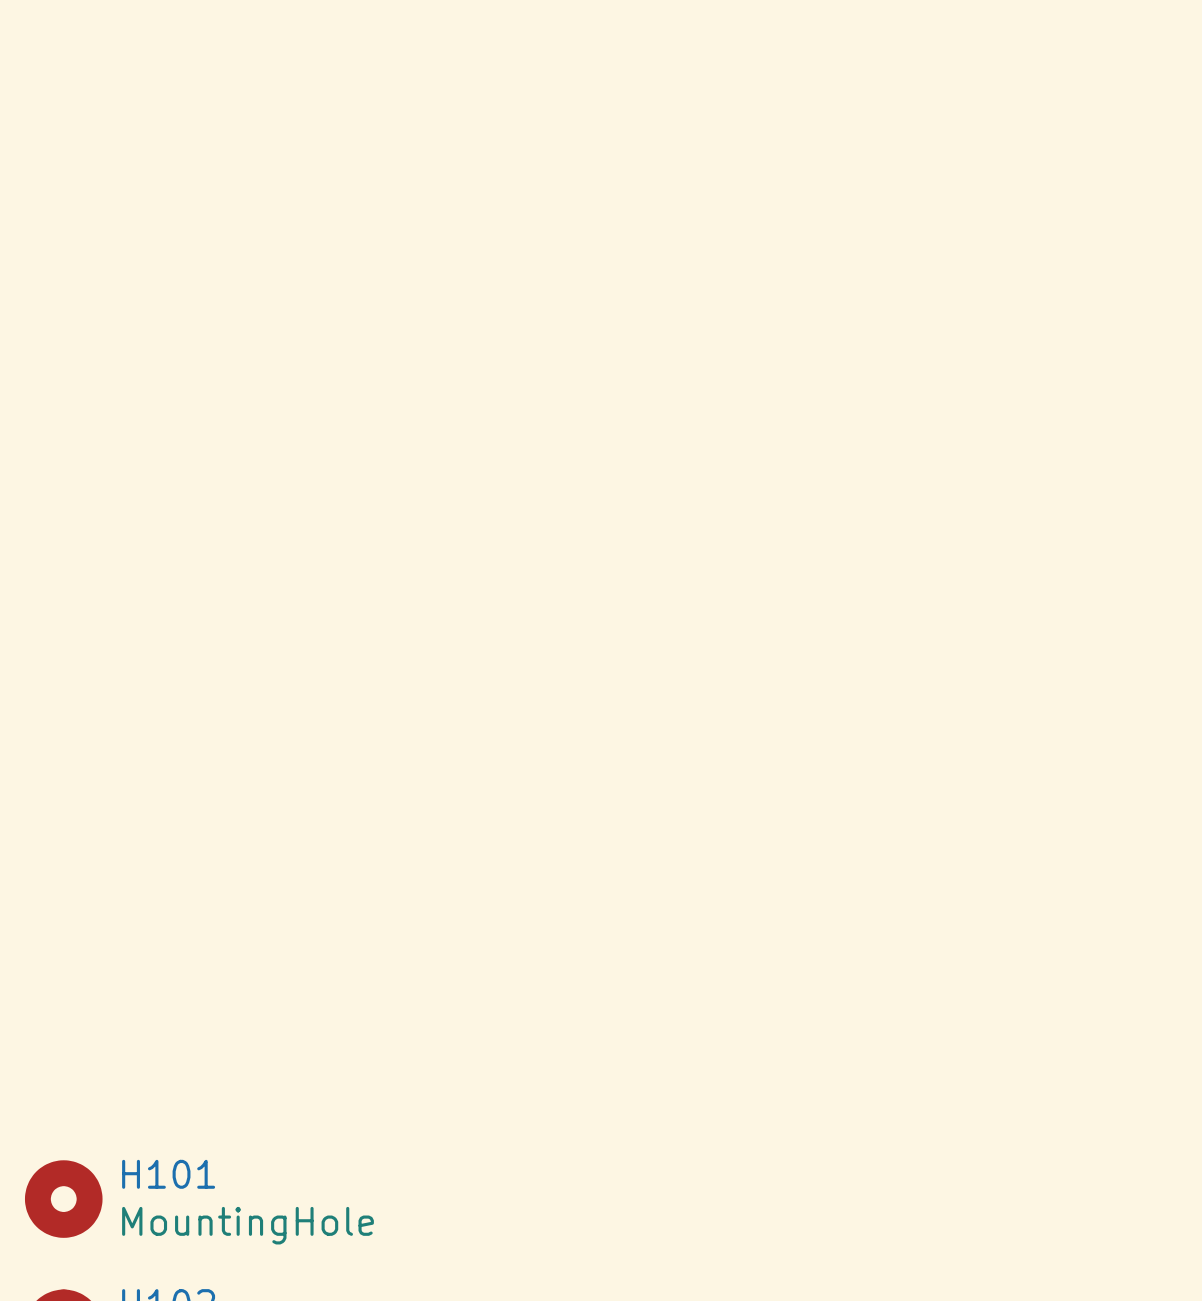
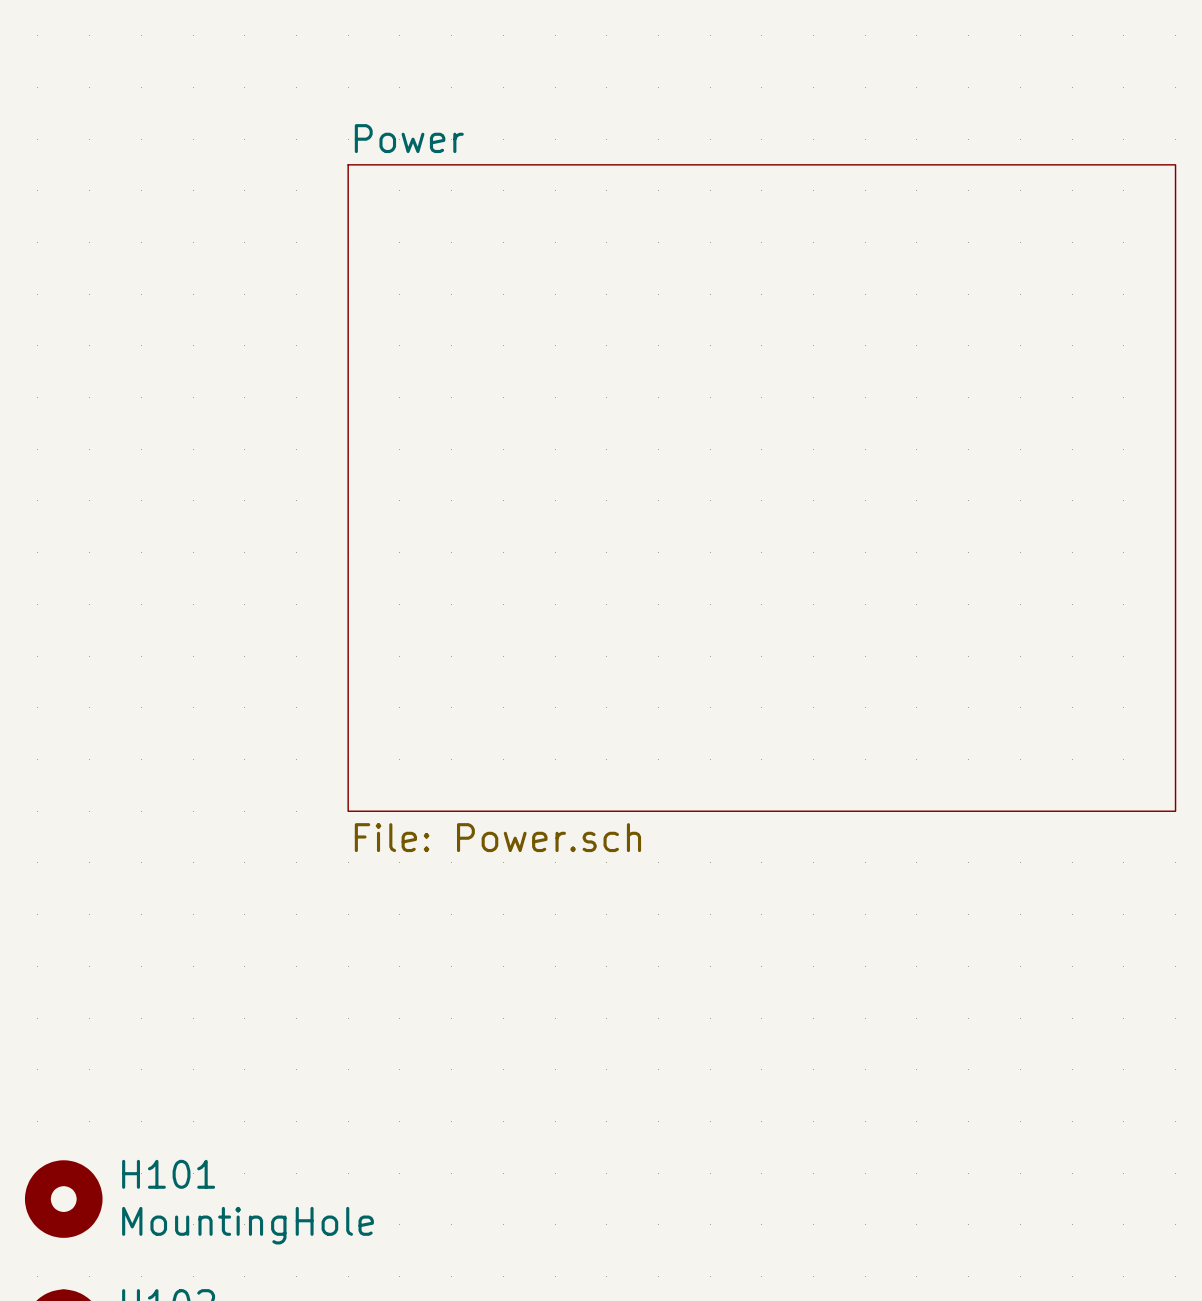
sheet Power: none -> File: Power.sch (761, 488)

